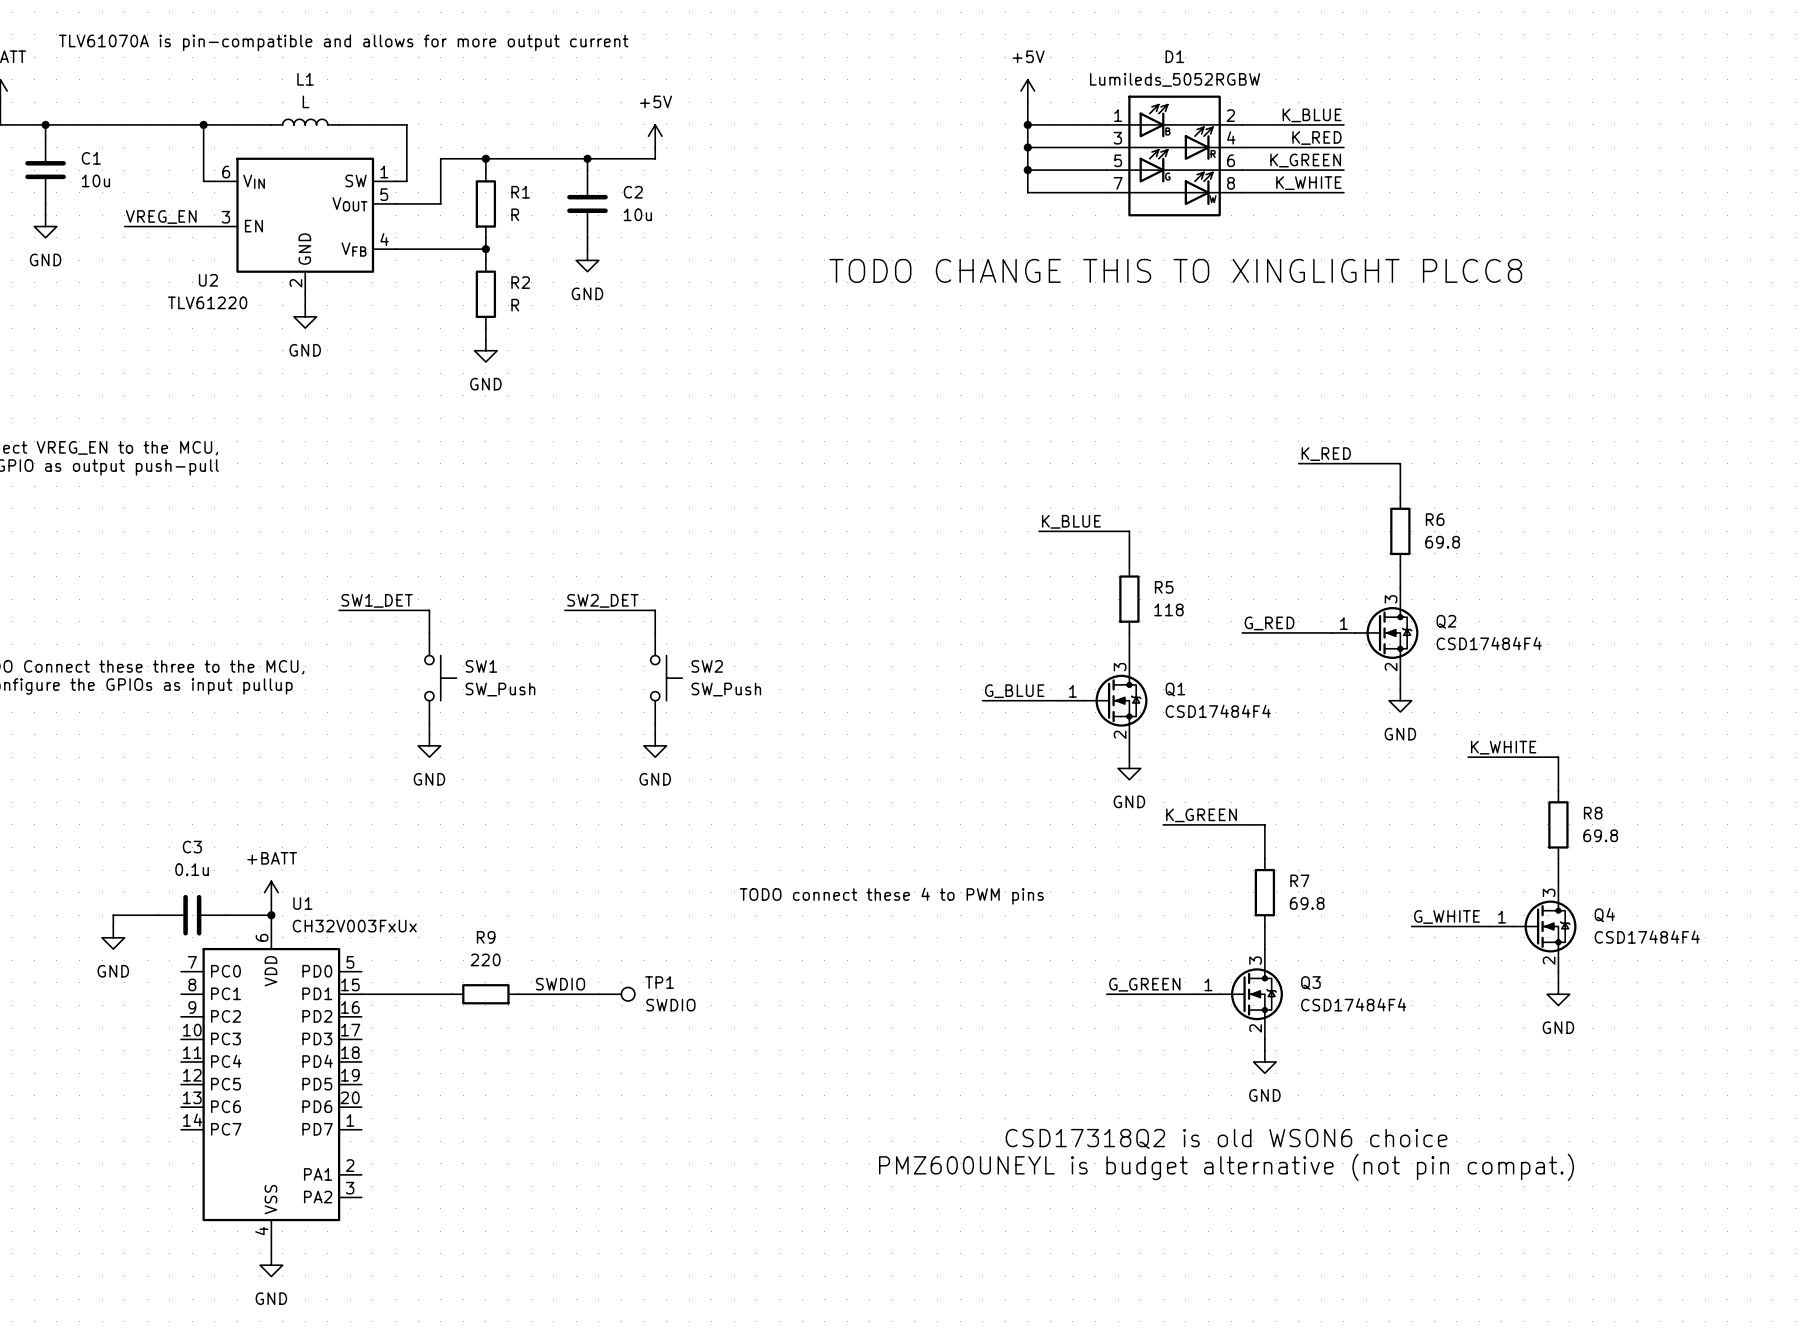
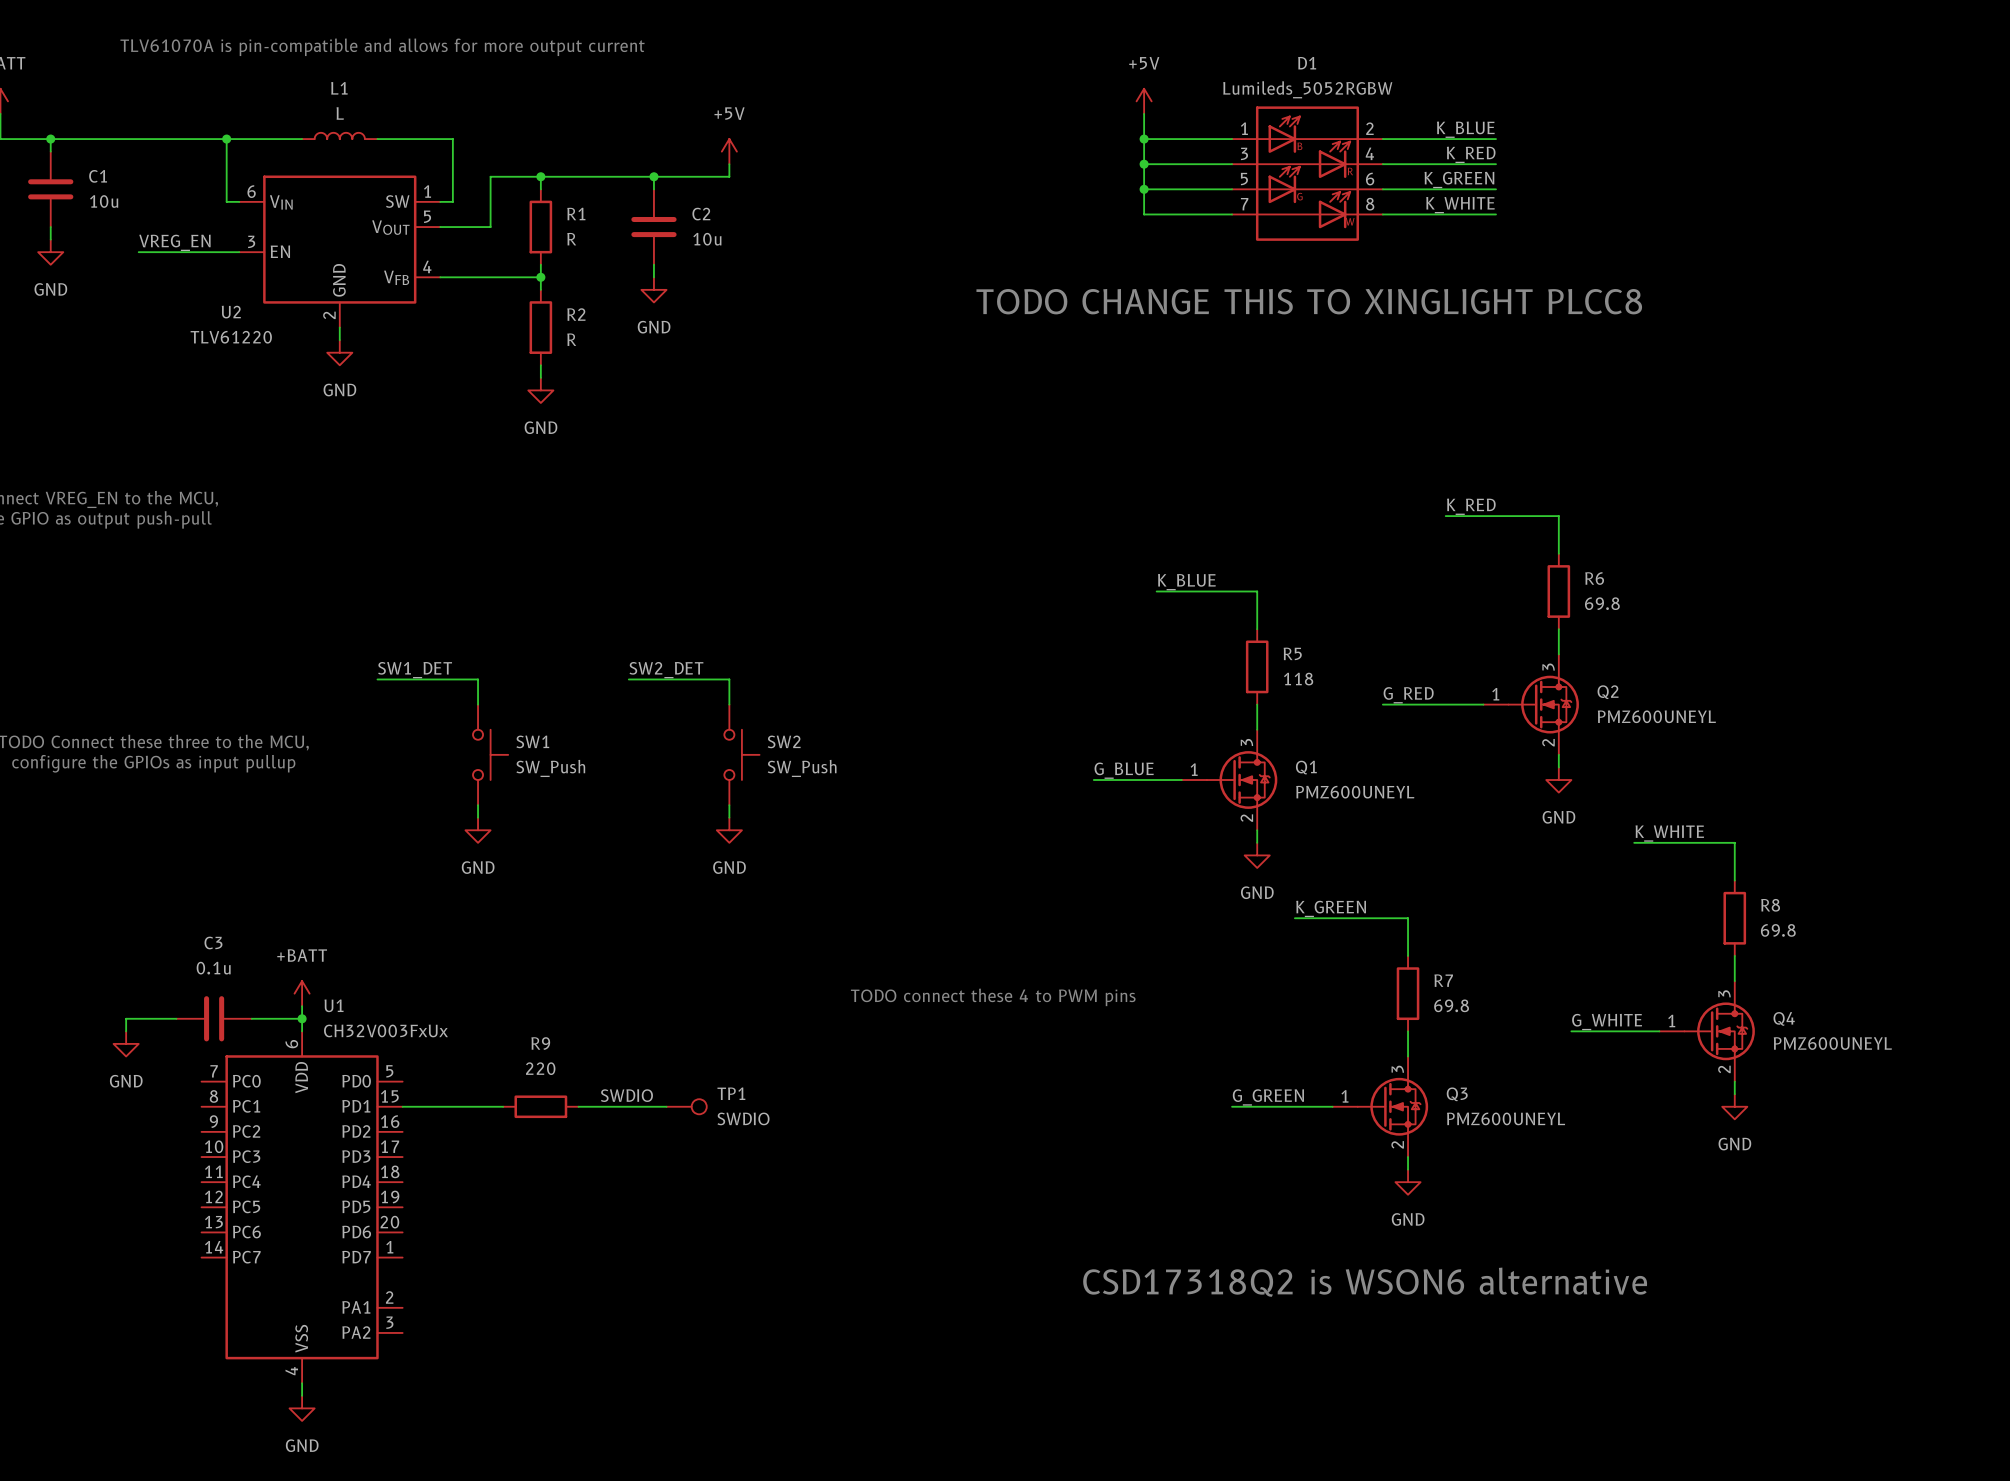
Q2 value: CSD17484F4 (1489, 643) -> PMZ600UNEYL (1656, 716)
Q1 value: CSD17484F4 (1218, 711) -> PMZ600UNEYL (1355, 792)
Q4 value: CSD17484F4 (1647, 937) -> PMZ600UNEYL (1832, 1043)
Q3 value: CSD17484F4 (1353, 1004) -> PMZ600UNEYL (1506, 1118)
text: CSD17318Q2 is old WSON6 choice (1226, 1138) -> CSD17318Q2 is WSON6 alternative (1365, 1282)
text: PMZ600UNEYL is budget alternative (not pin compat.) (1226, 1167) -> none

